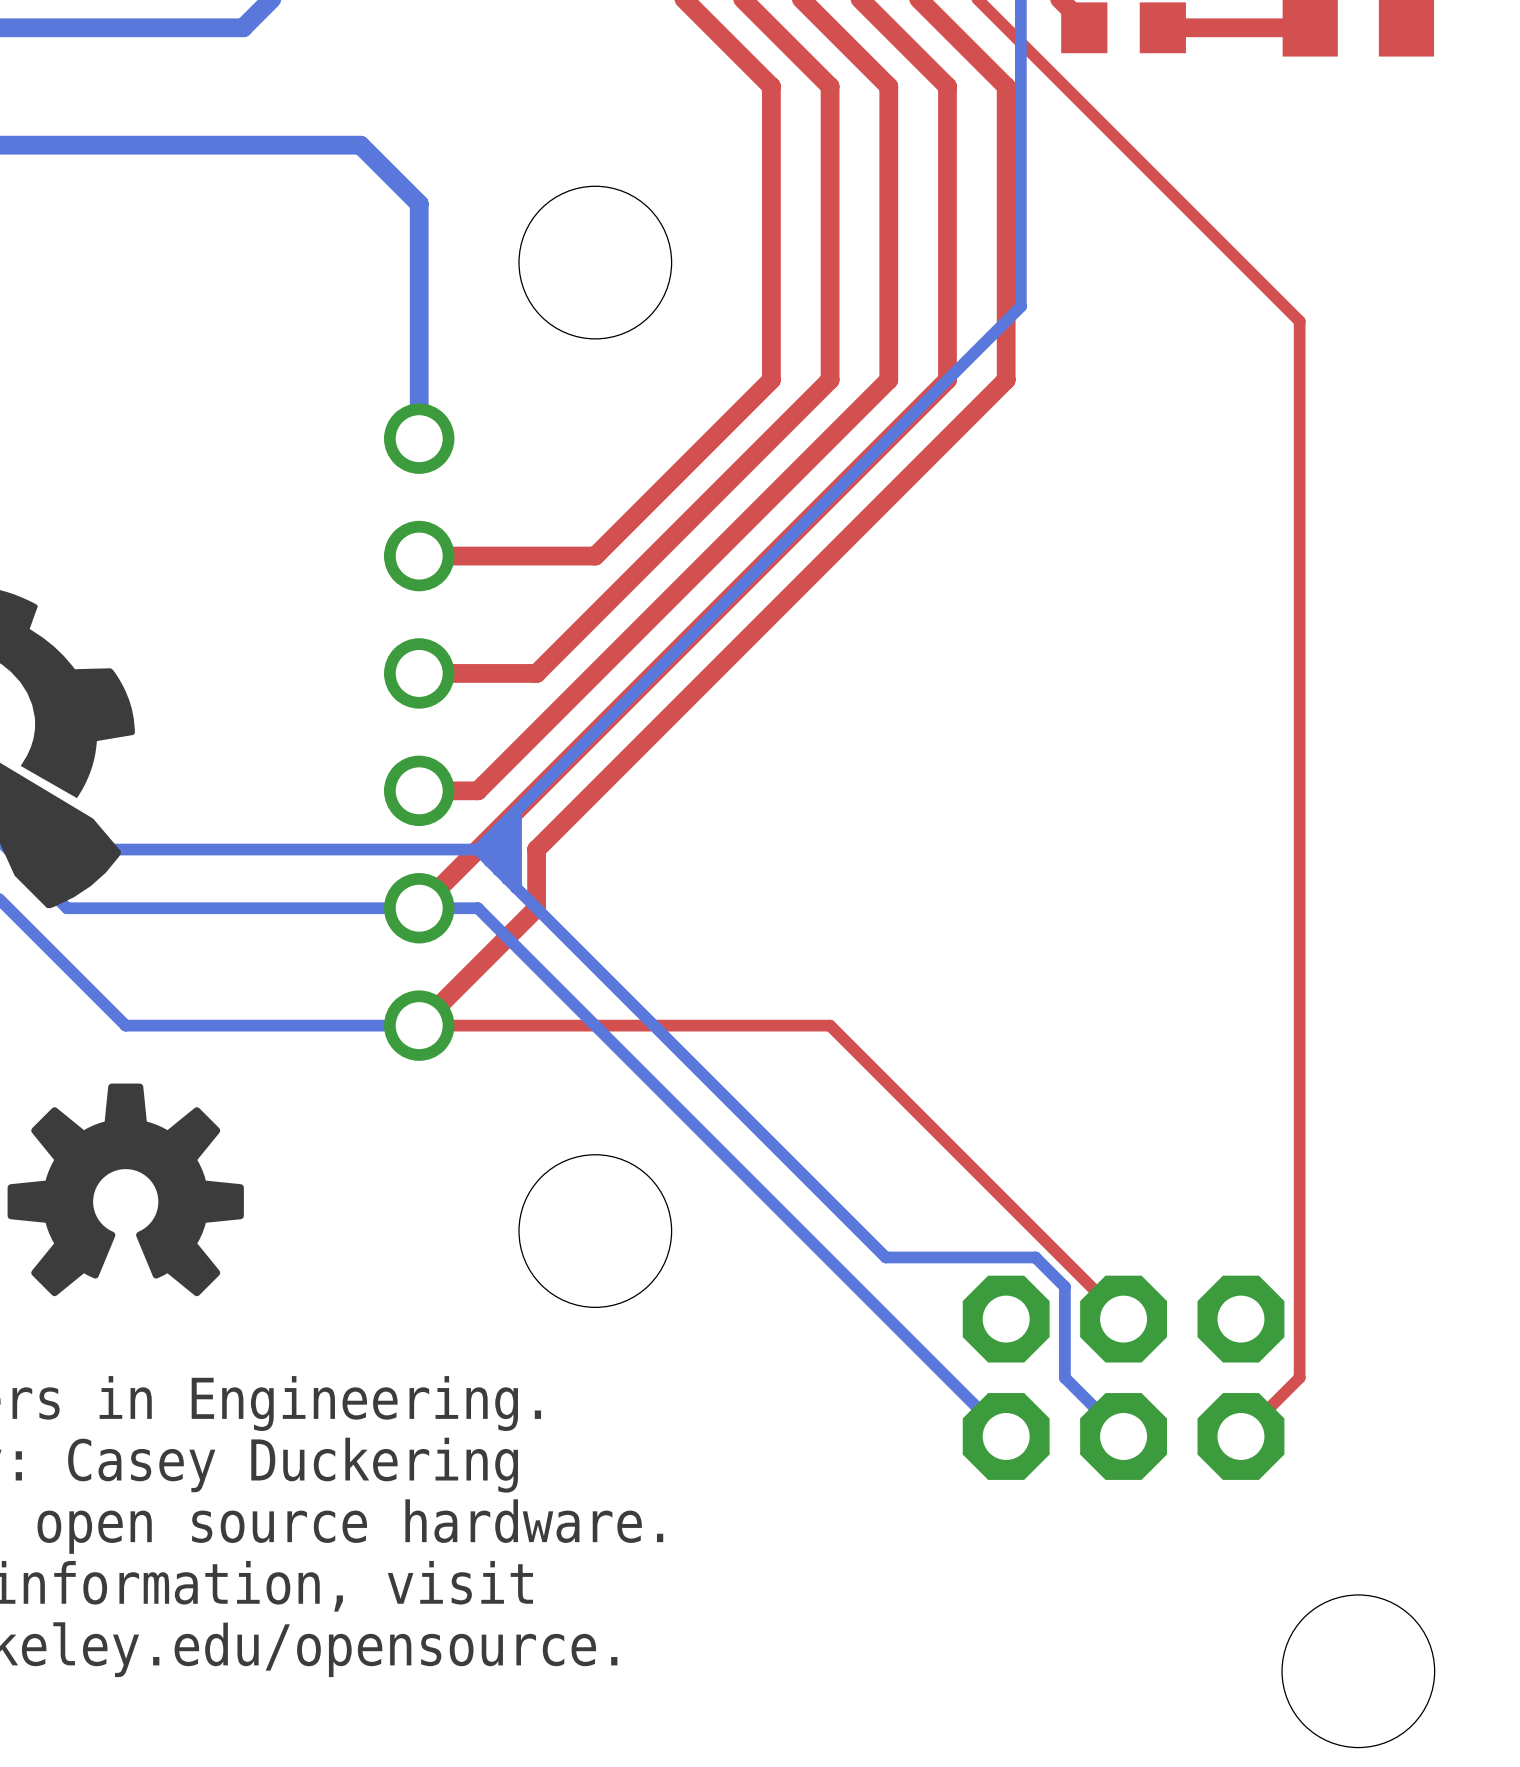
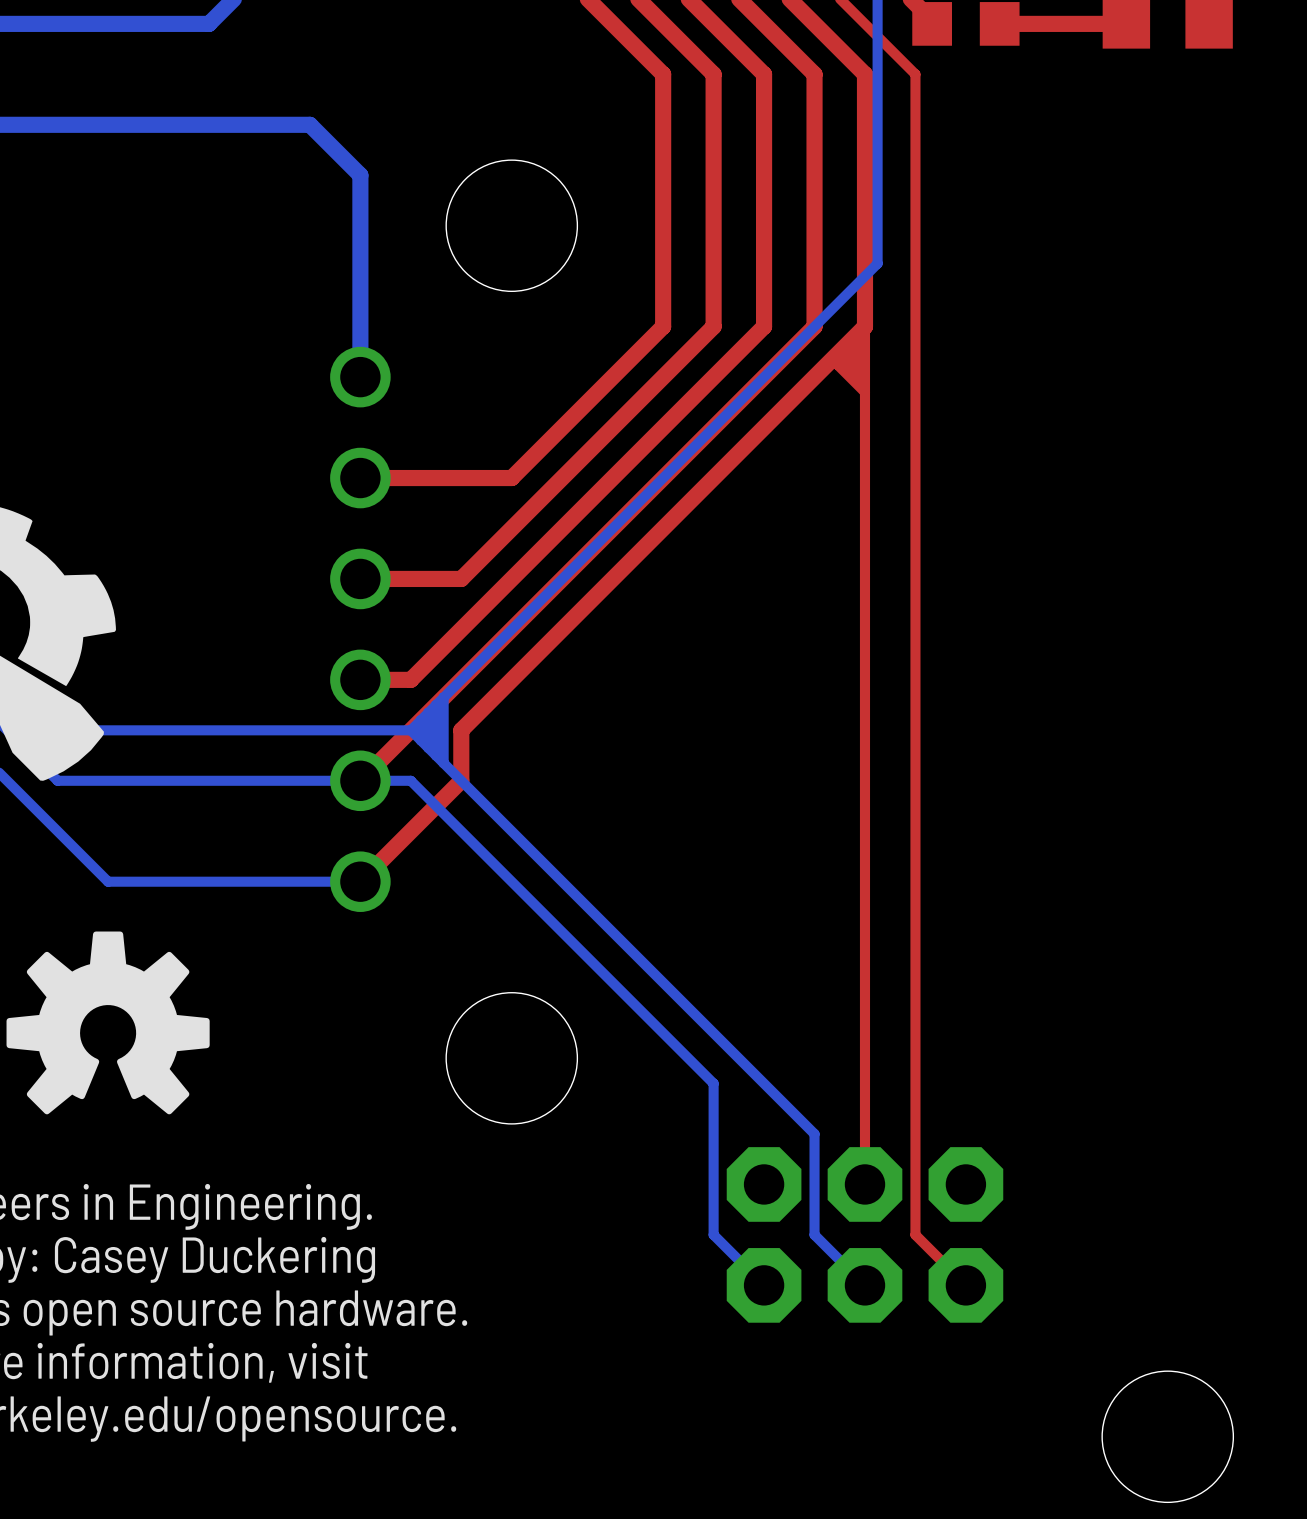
top track: (1064, 86) (1299, 321) (1299, 1377) (1240, 1436) -> (915, 74) (915, 1234) (965, 1285)
top track: none -> (864, 326) (864, 1184)
top track: none -> (857, 359) (852, 364) (847, 364) (859, 377) (859, 344) (839, 364) (837, 364) (864, 392)
top track: (419, 1025) (830, 1025) (1123, 1319) -> none
bottom track: (885, 1257) (1035, 1257) (1064, 1286) (1064, 1377) (1123, 1436) -> (761, 1081) (814, 1134) (814, 1234) (864, 1285)
bottom track: (830, 1260) (1006, 1436) -> (713, 1083) (713, 1234) (764, 1285)
part position: (1123, 1377) -> (864, 1234)

